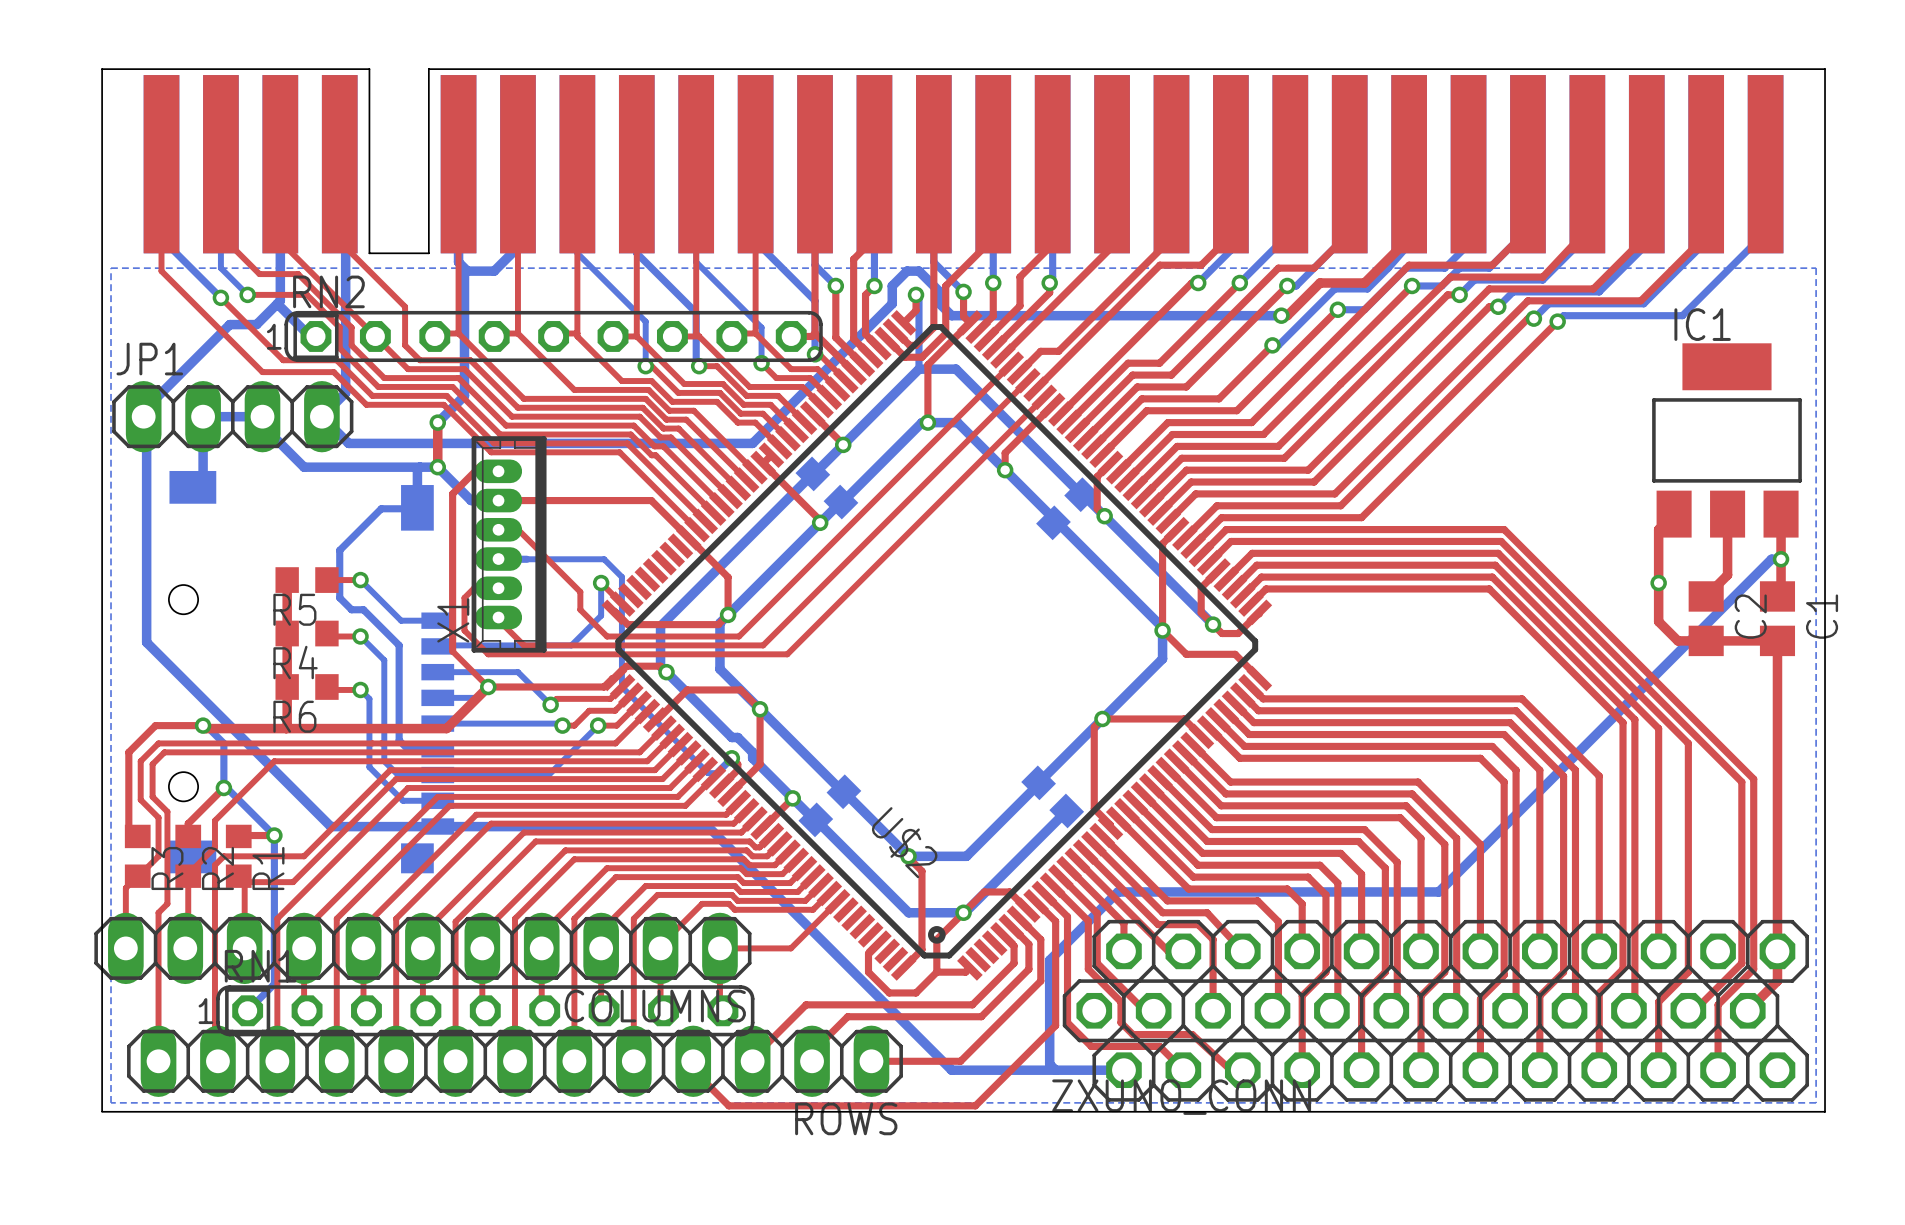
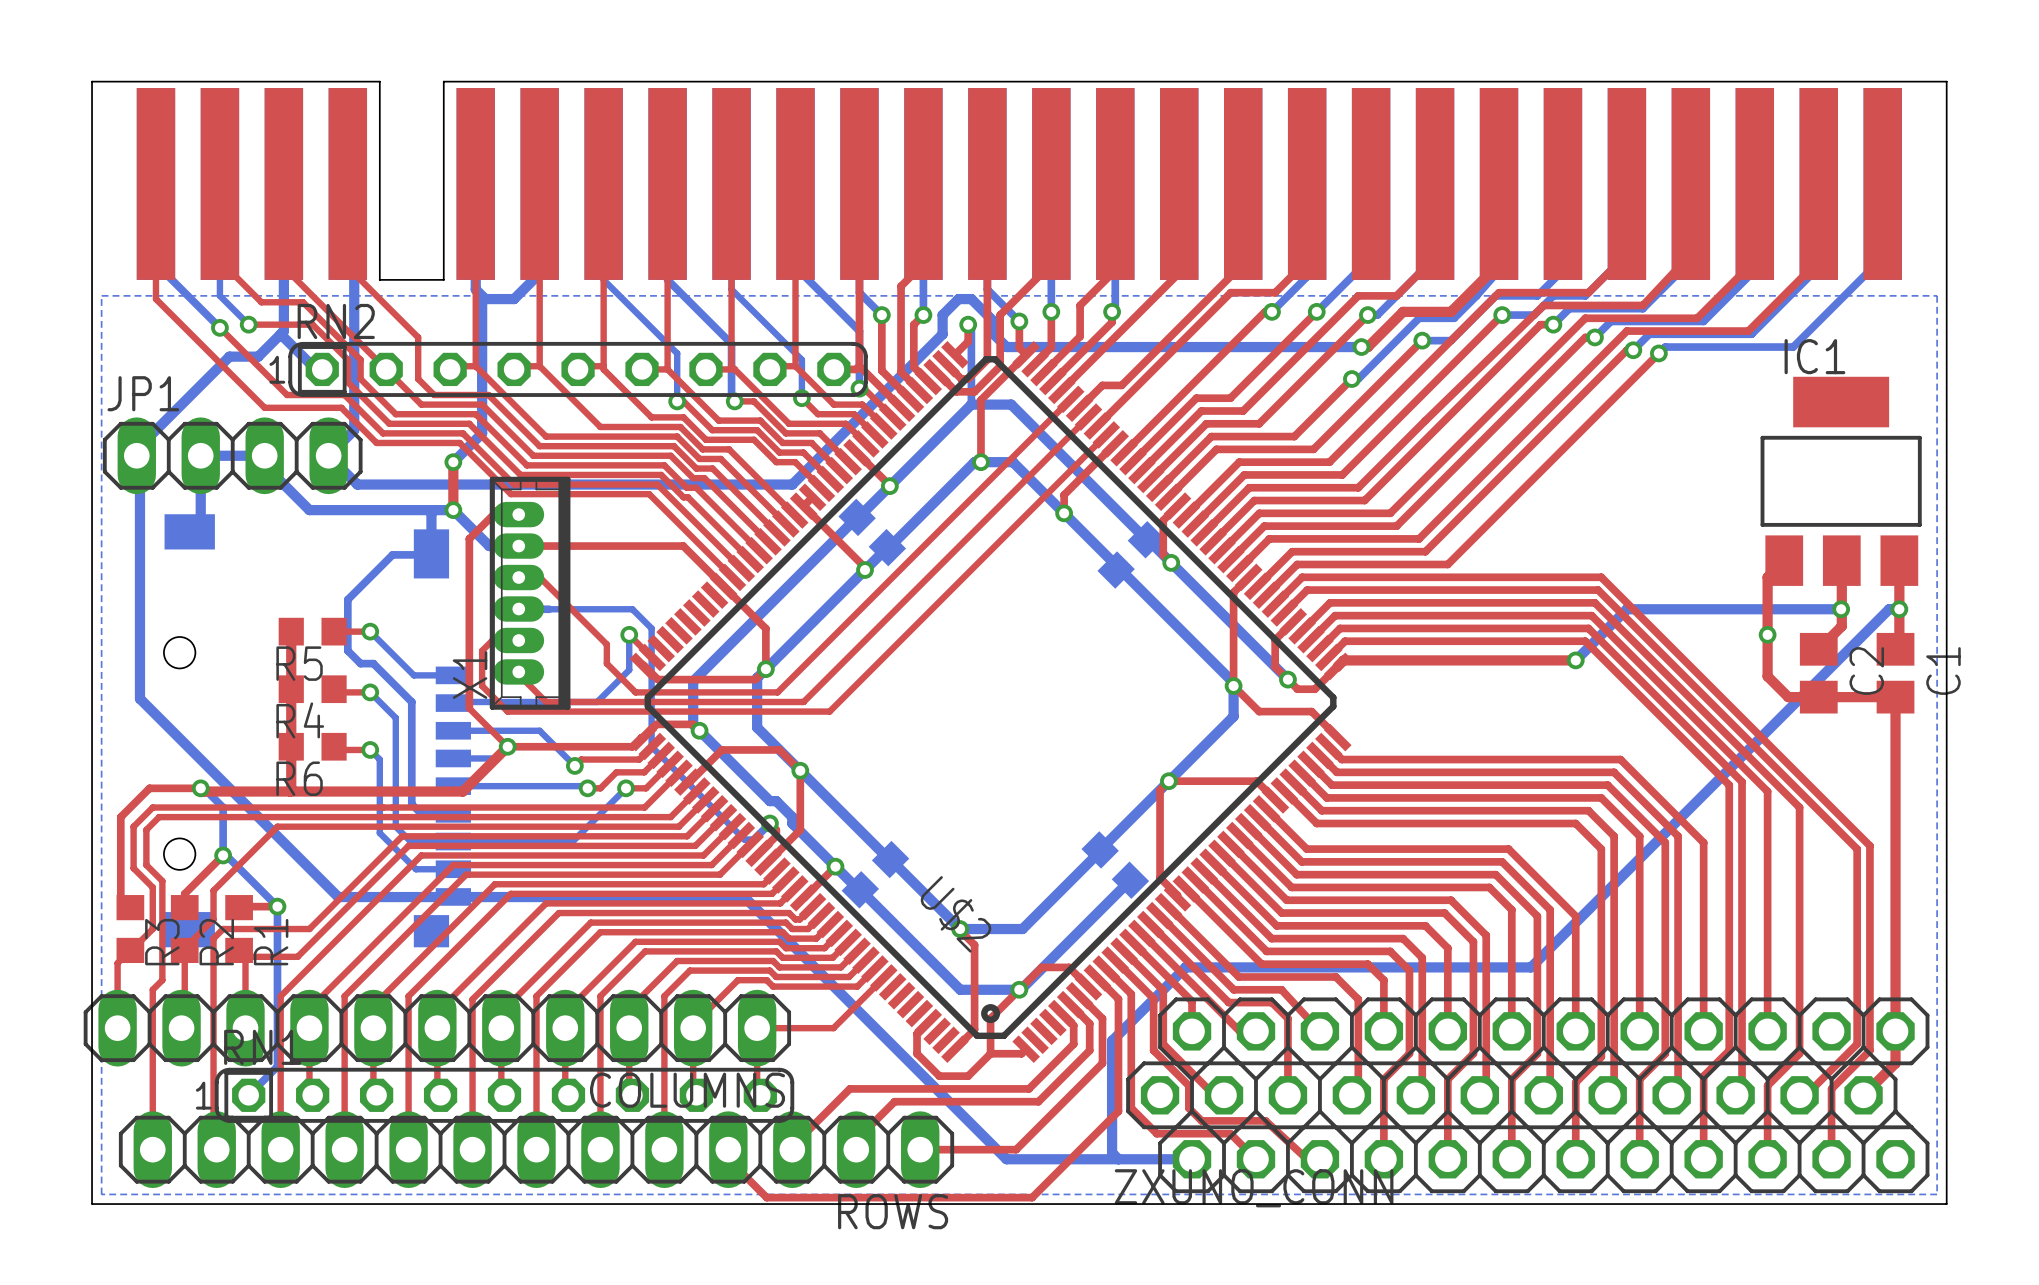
bottom track: none -> (1841, 609) (1626, 609) (1575, 660)
via: none -> (1841, 609)
top track: none -> (1575, 660) (1343, 660) (1337, 666)
via: none -> (1575, 660)

